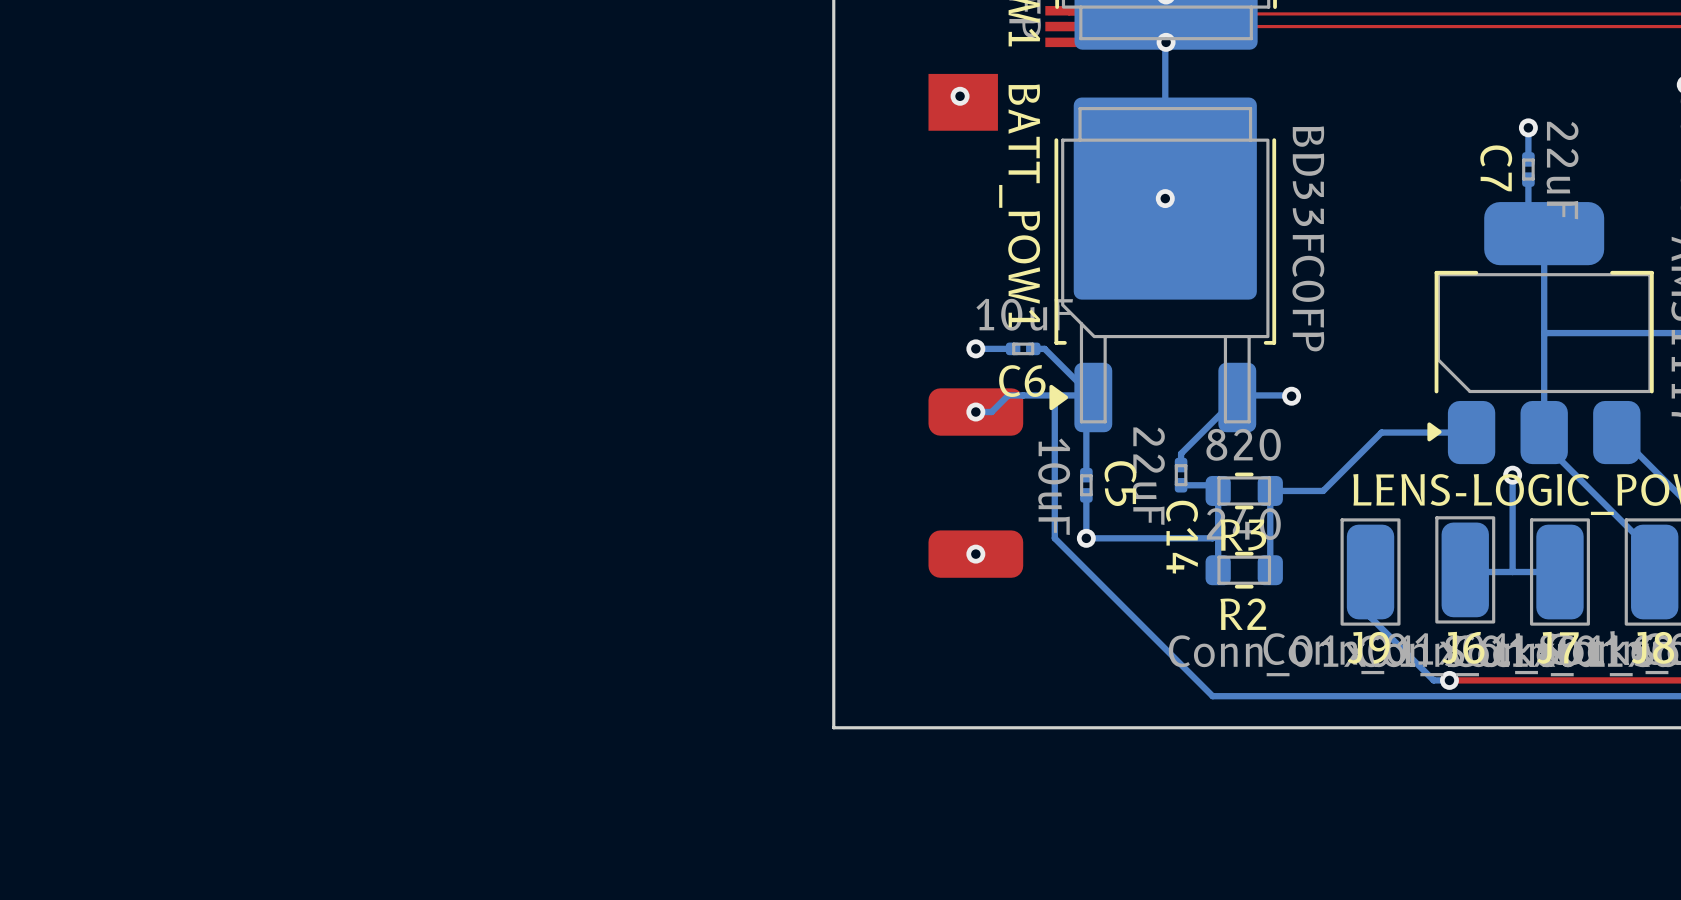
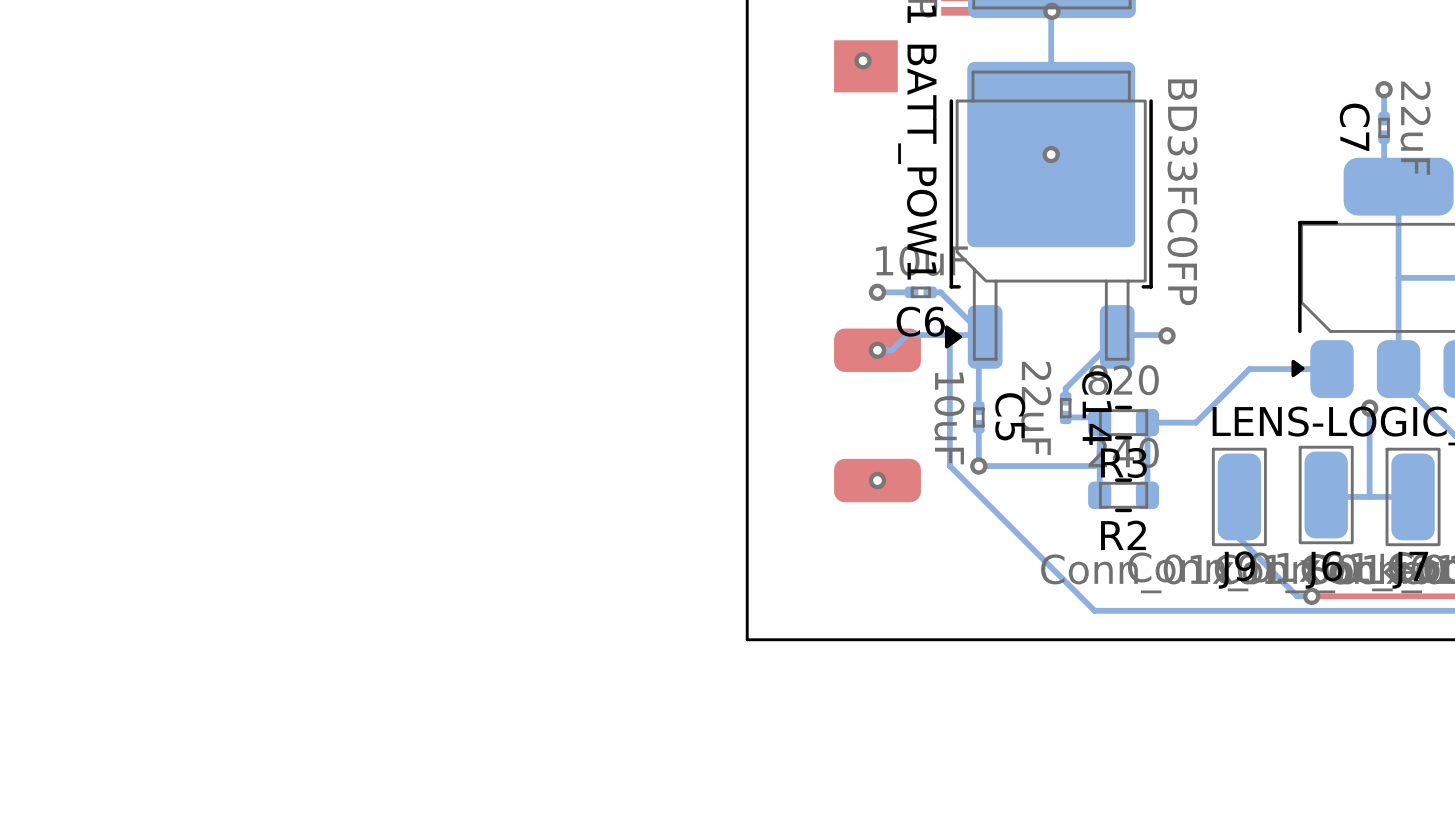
C14 name position: C14 (1182, 537) -> C14 (1097, 408)

